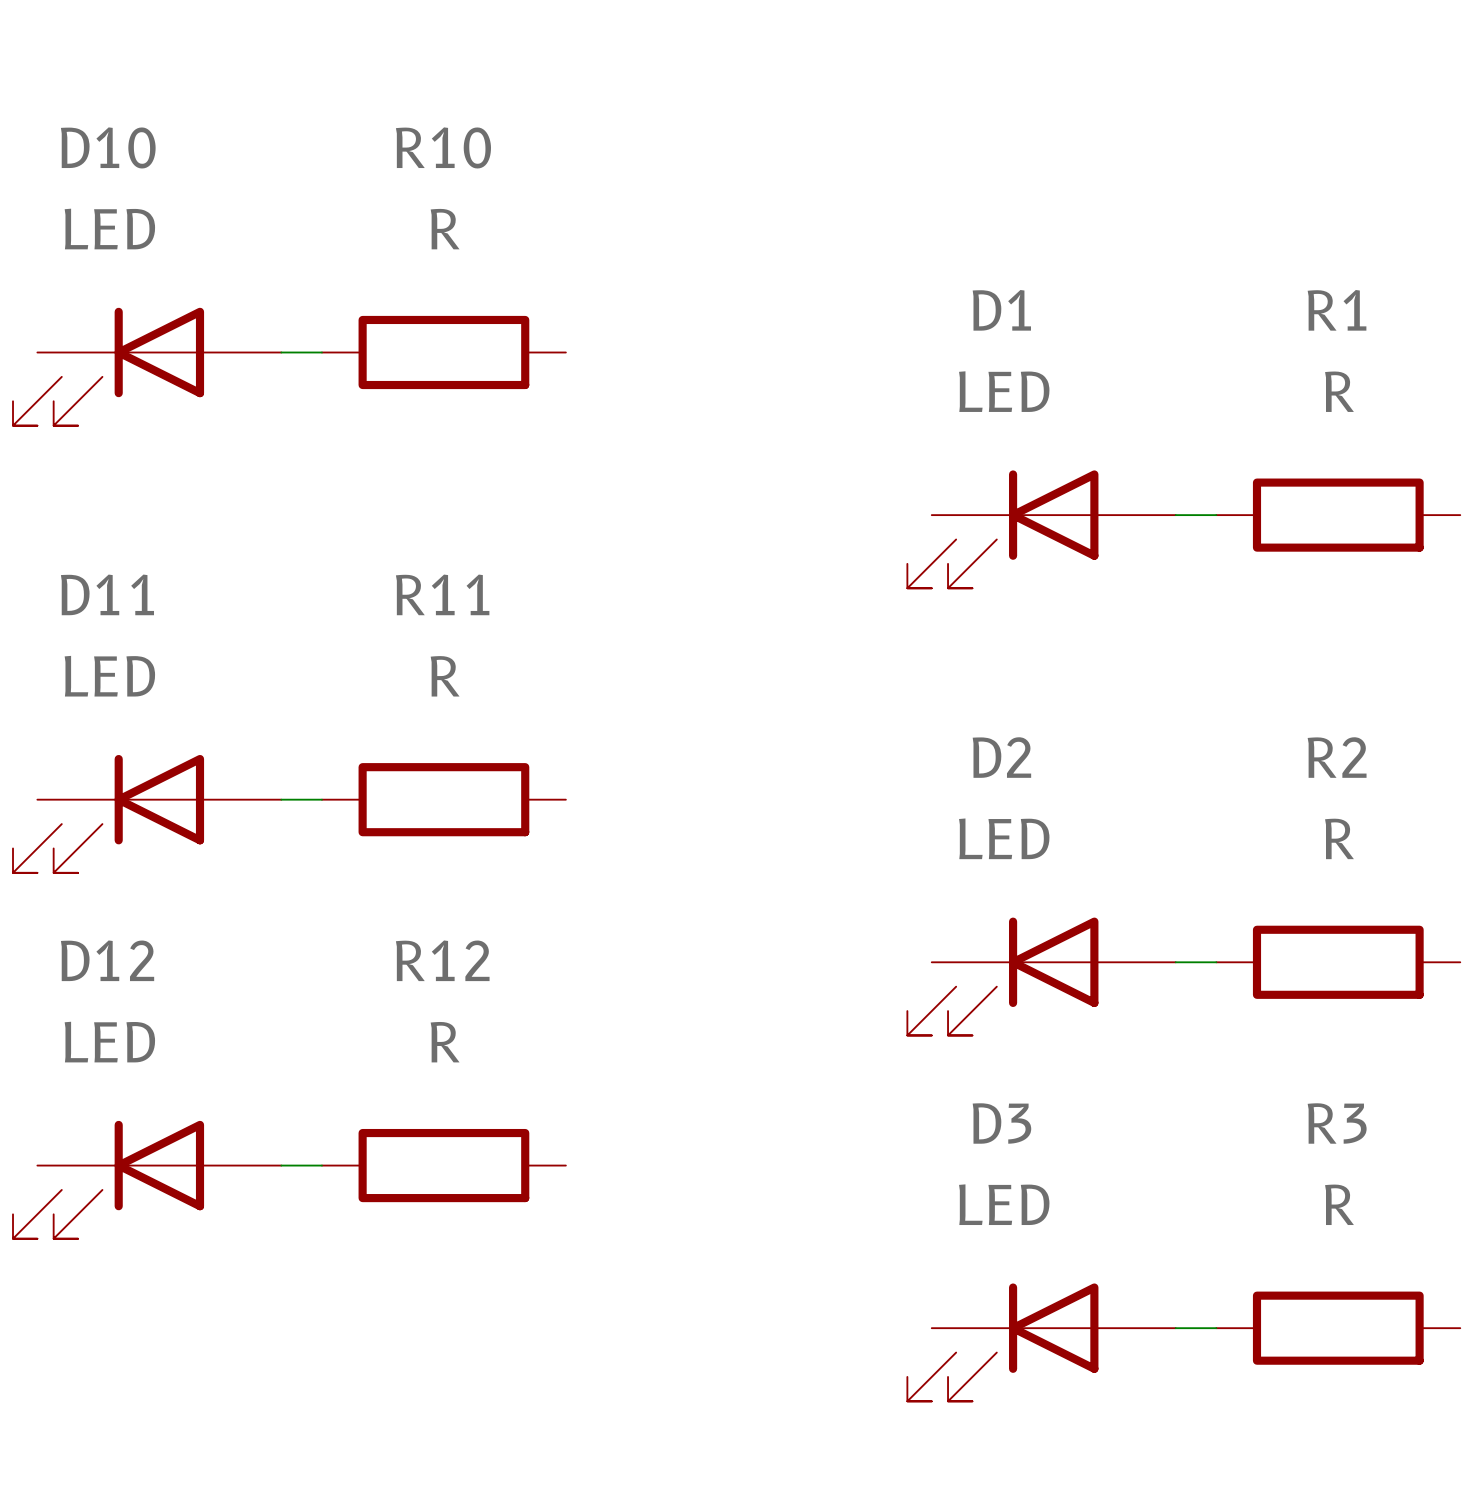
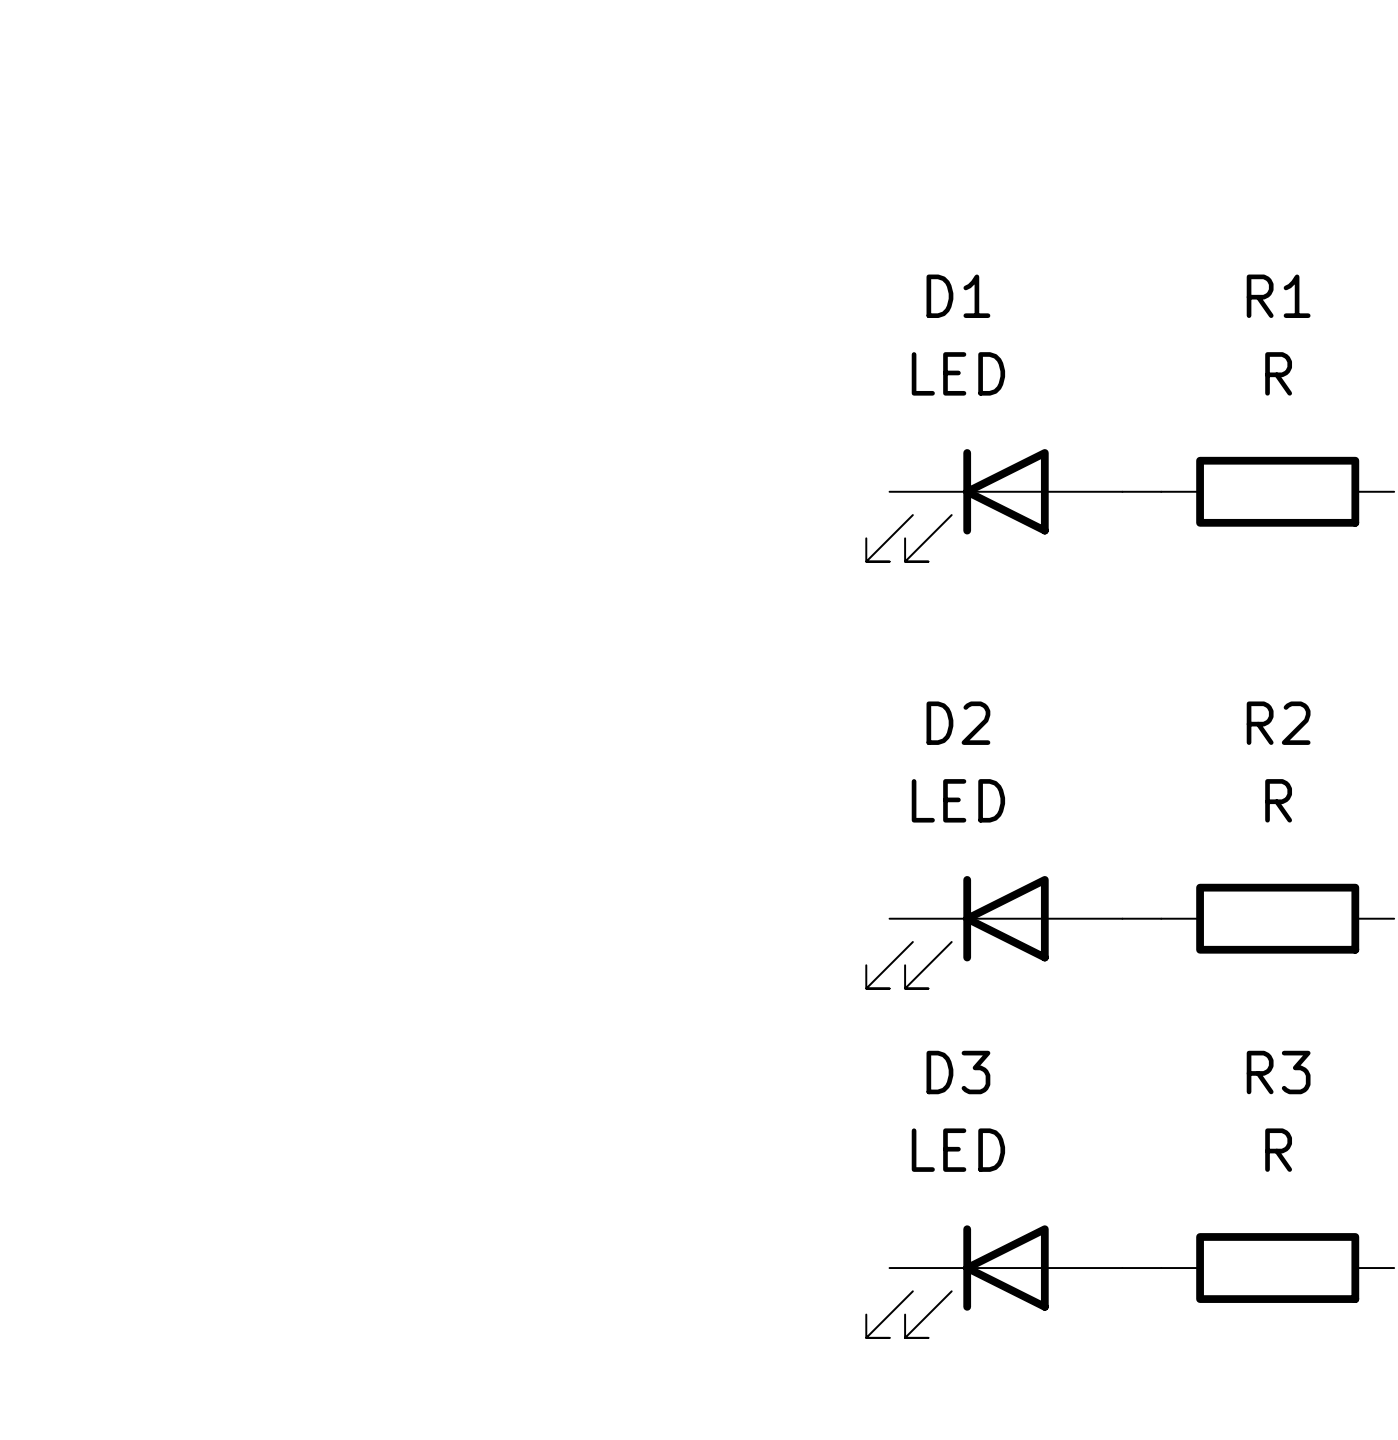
wire: (281, 352) (321, 352) -> none
R10: R (443, 352) -> none
D10: LED (147, 366) -> none
wire: (281, 799) (321, 799) -> none
R11: R (443, 799) -> none
D11: LED (147, 813) -> none
wire: (281, 1165) (321, 1165) -> none
R12: R (443, 1165) -> none
D12: LED (147, 1179) -> none

